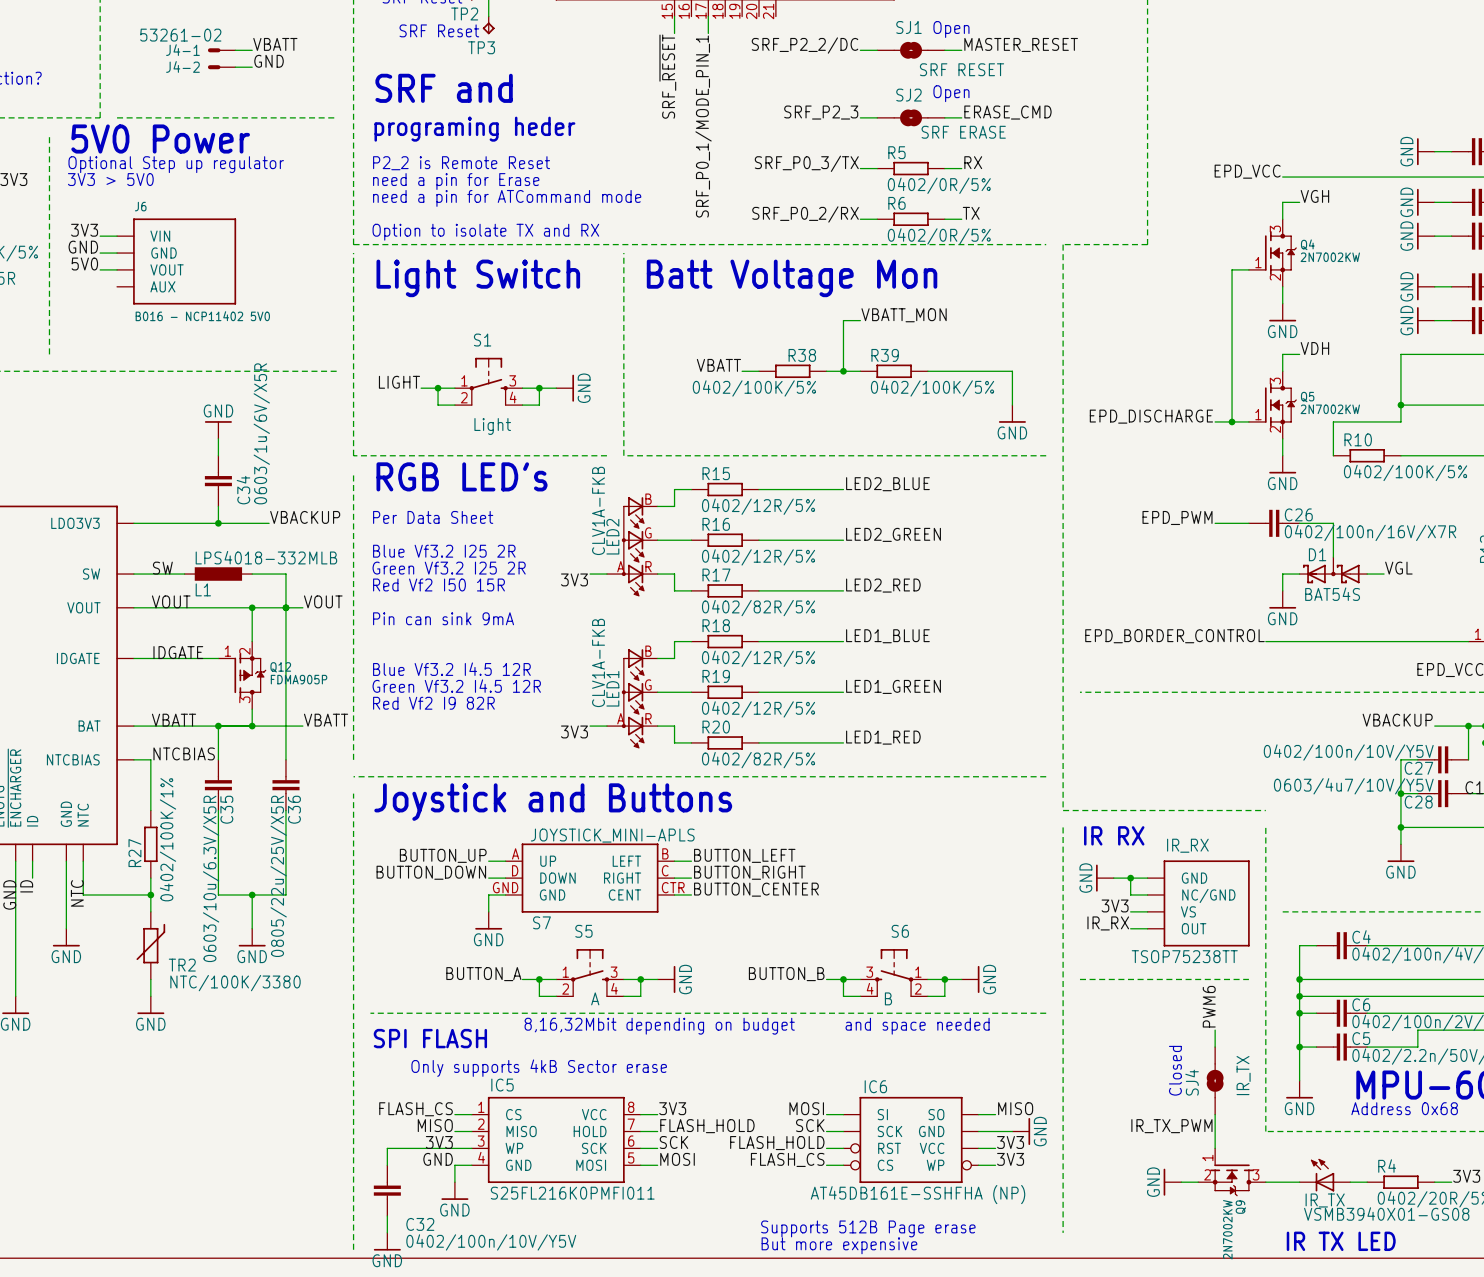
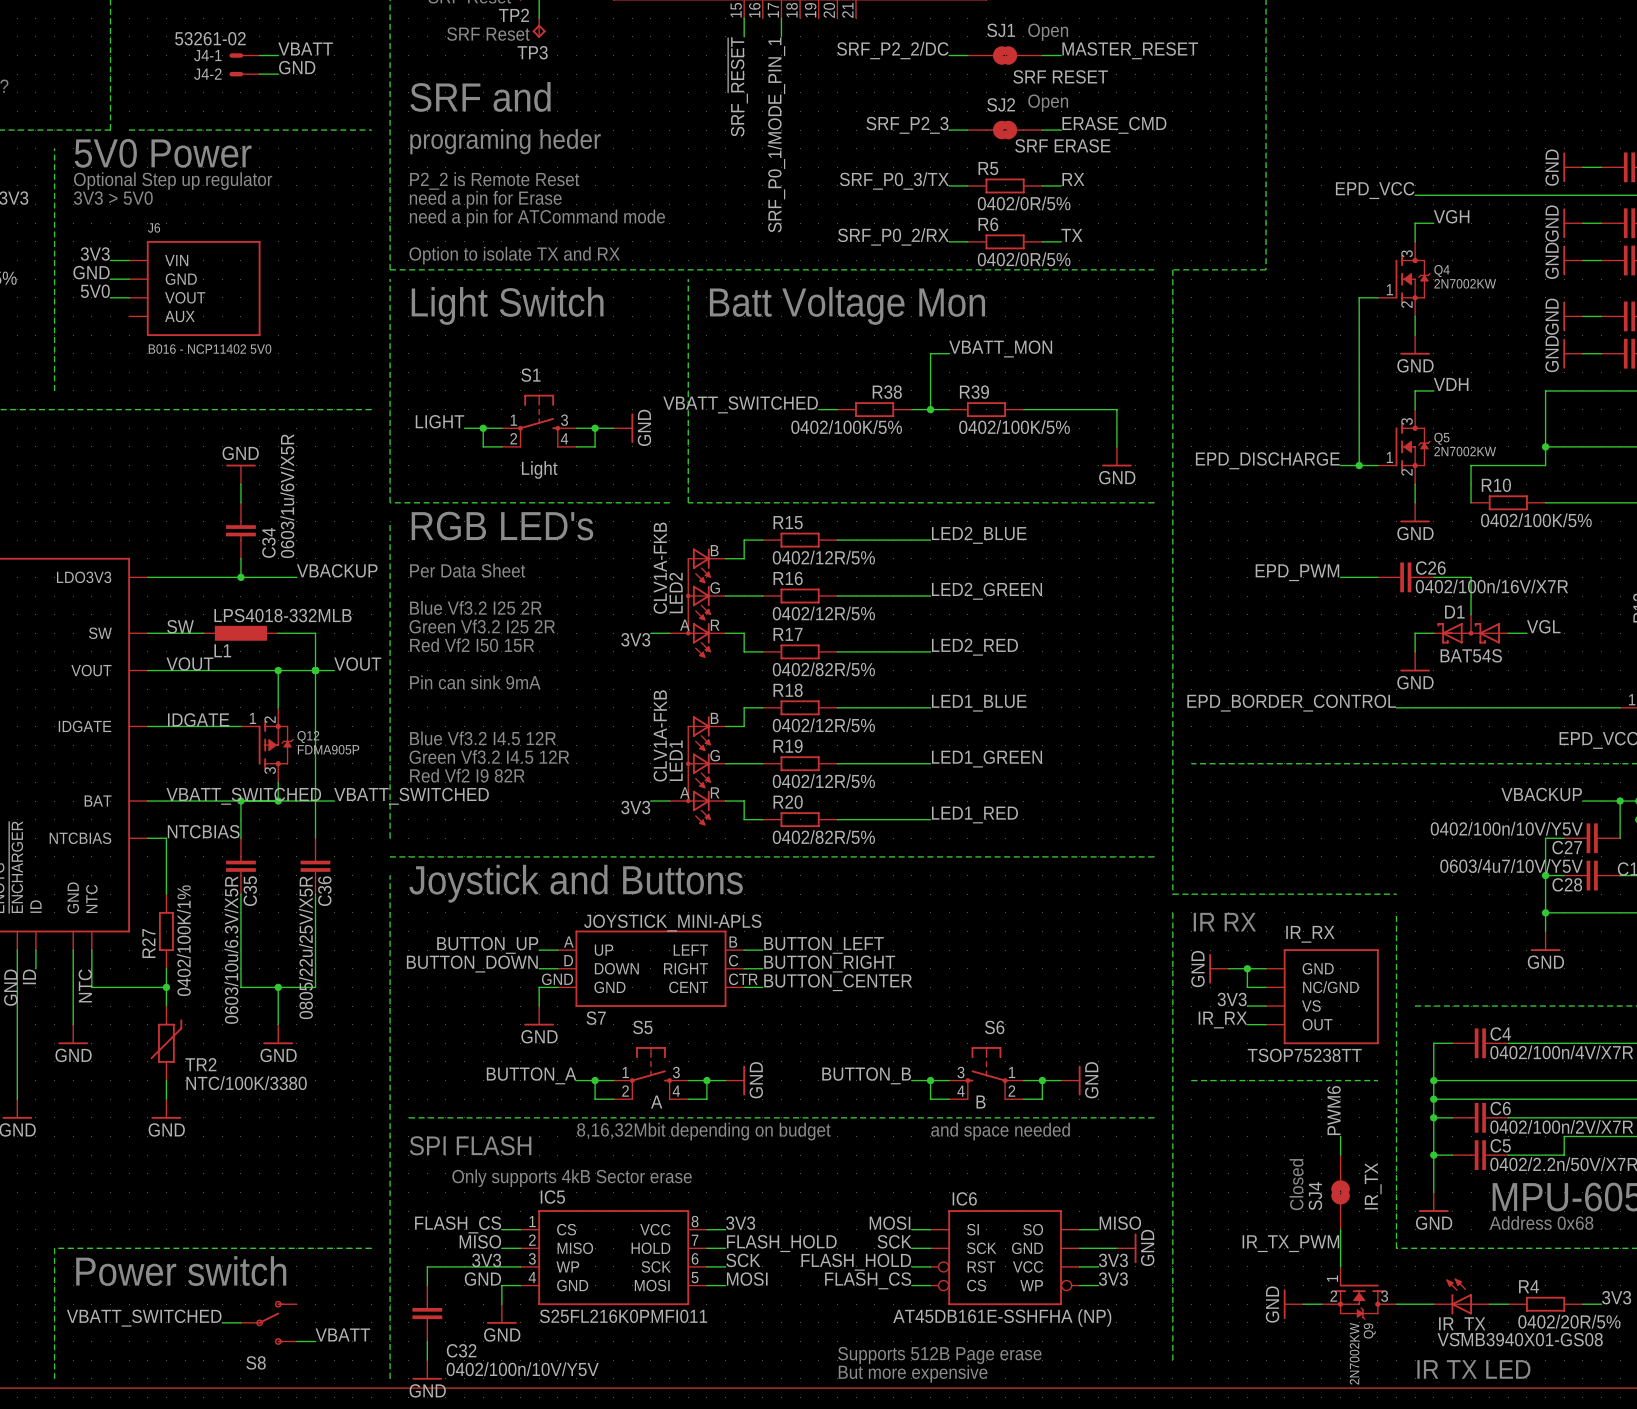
label: VBATT (718, 365) -> VBATT_SWITCHED (740, 404)
label: VBATT (174, 720) -> VBATT_SWITCHED (243, 796)
label: VBATT (326, 720) -> VBATT_SWITCHED (411, 796)
wire: none -> (371, 1248) (54, 1248) (54, 1378)
text: none -> Power switch (181, 1271)
label: none -> VBATT_SWITCHED (144, 1318)
wire: none -> (222, 1322) (240, 1322)
S8: none -> (268, 1322)
label: none -> VBATT (342, 1334)
wire: none -> (296, 1341) (315, 1341)

